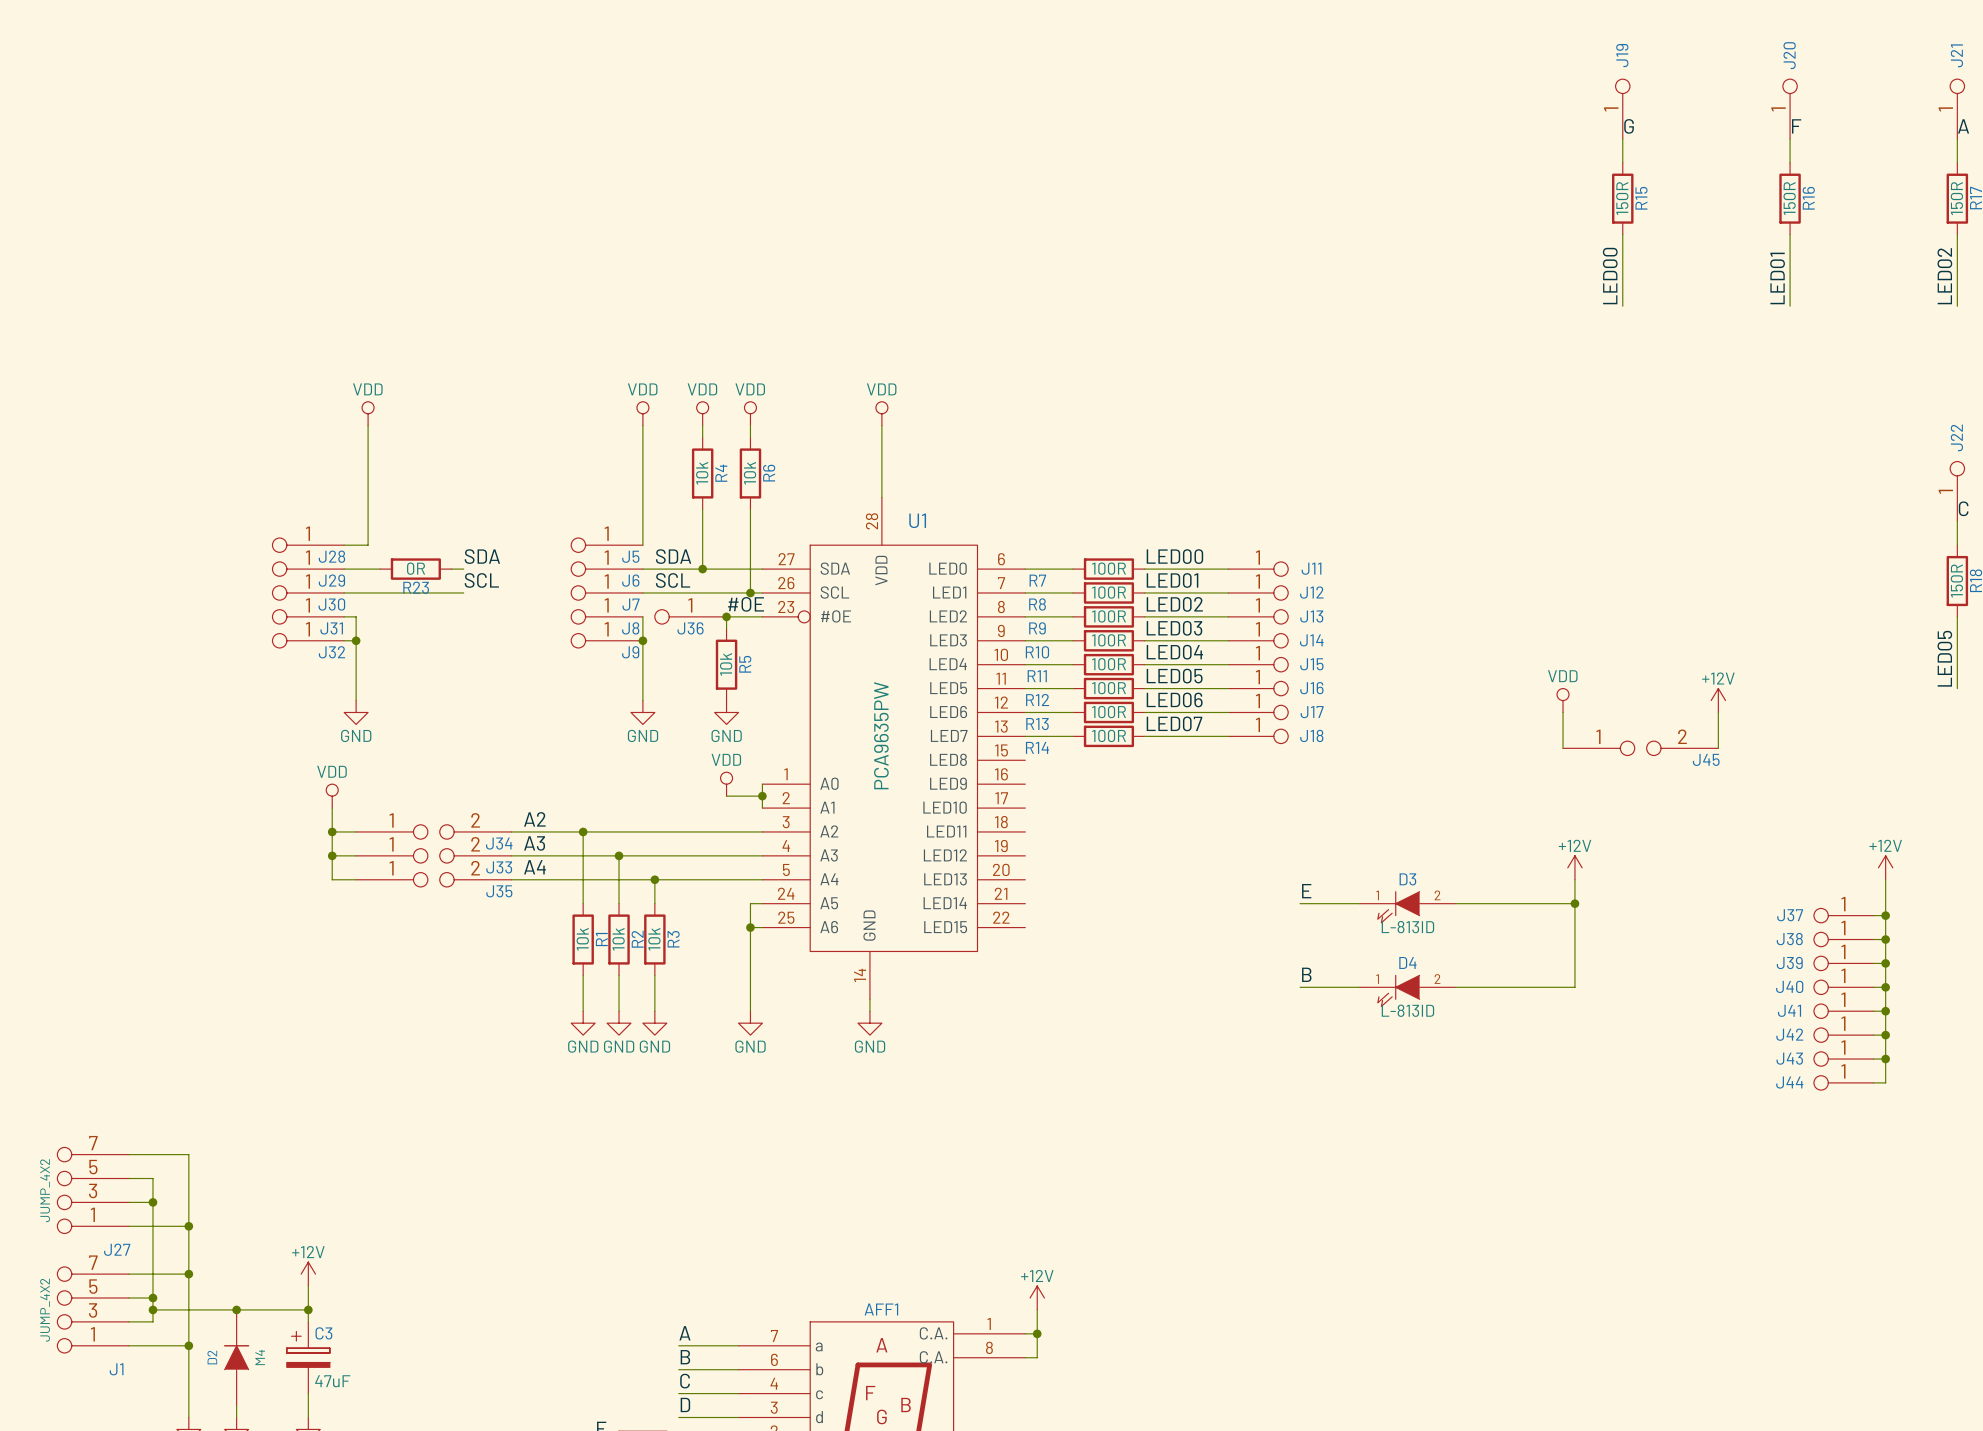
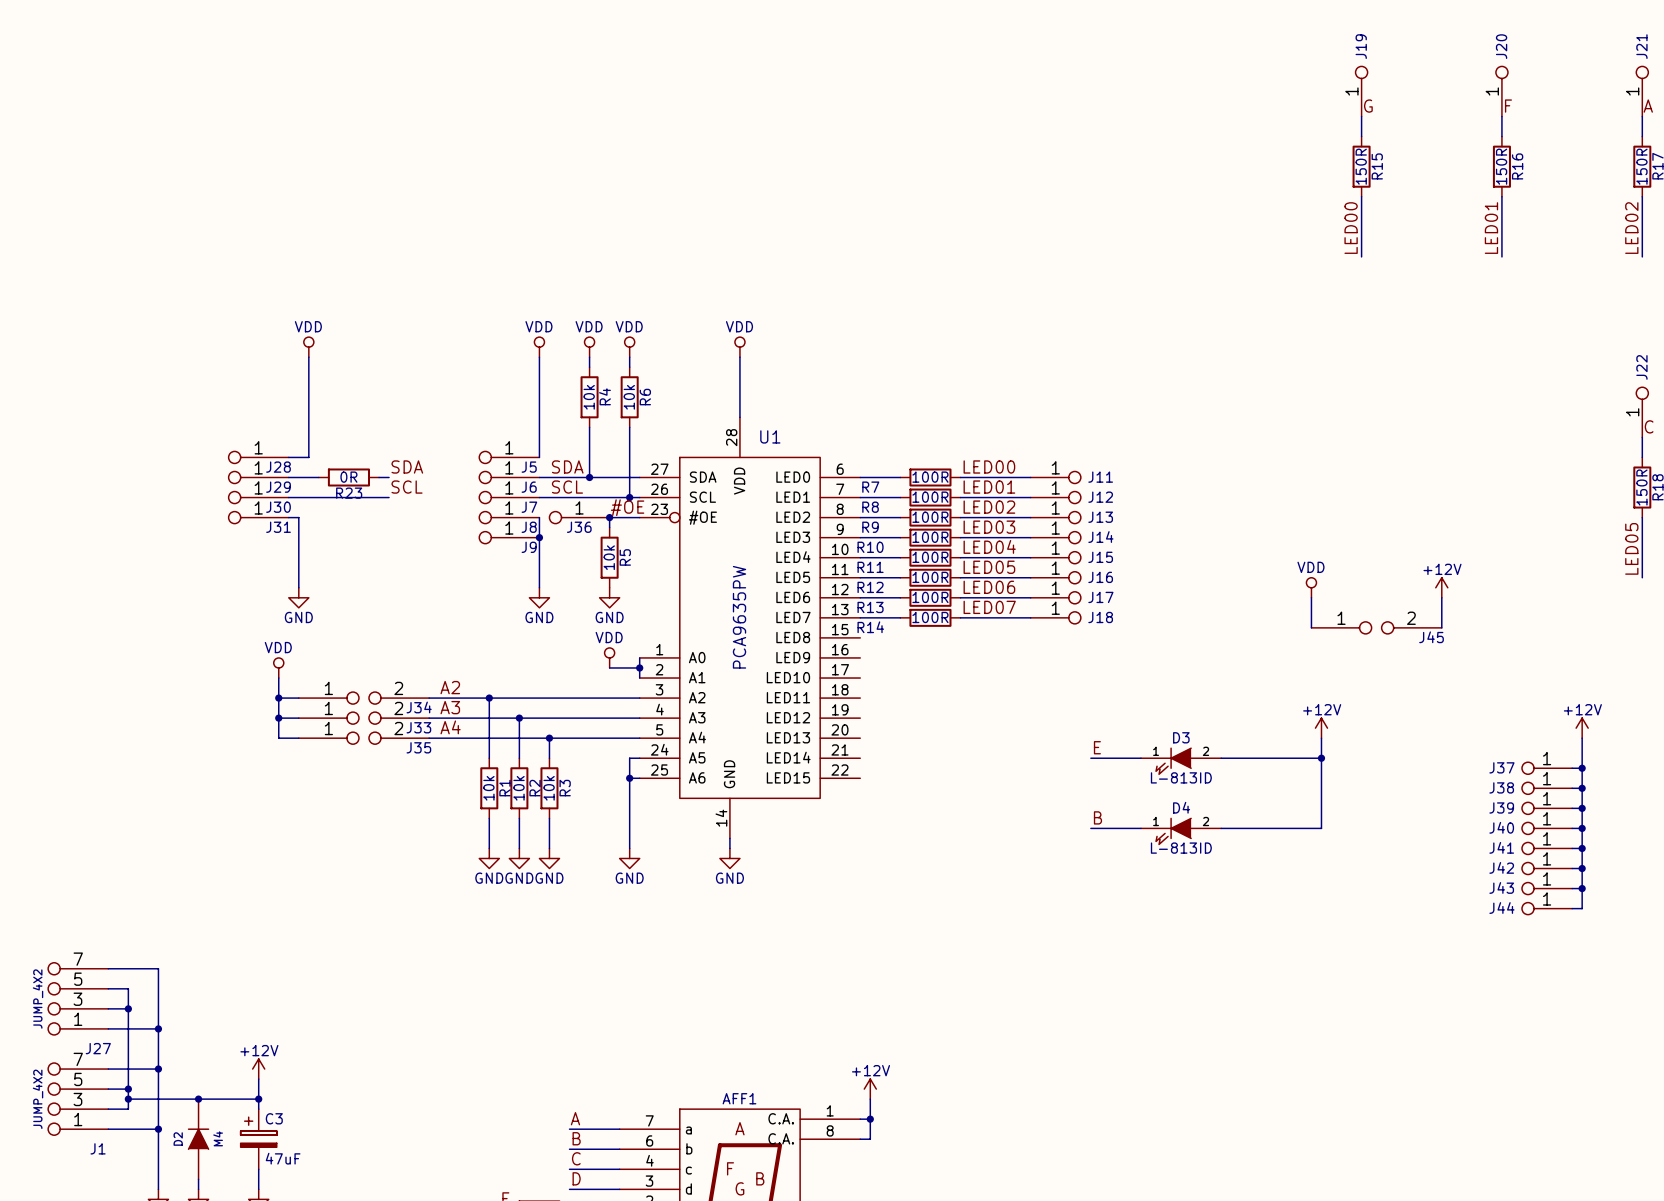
J32: (308, 640) -> none
wire: (344, 640) (356, 640) -> none
junction: (356, 640) -> none

